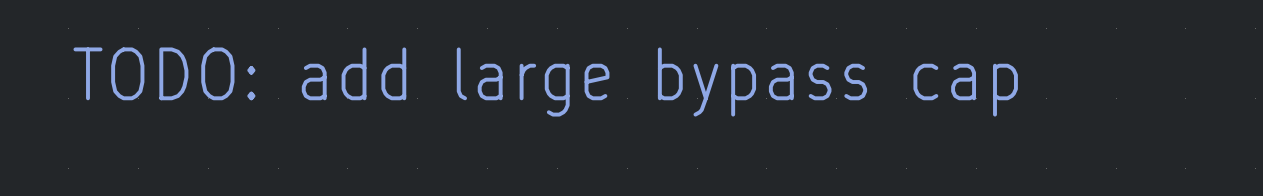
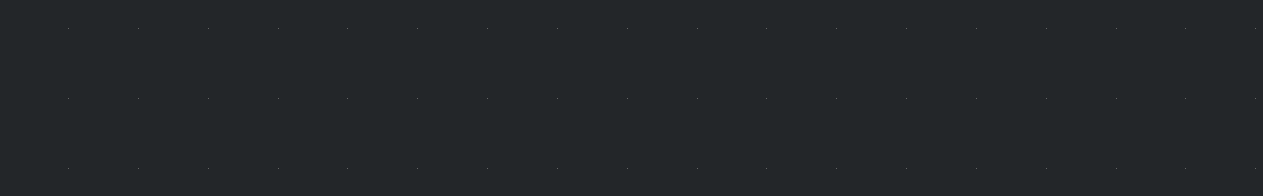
text: TODO: add large bypass cap (545, 82) -> none

